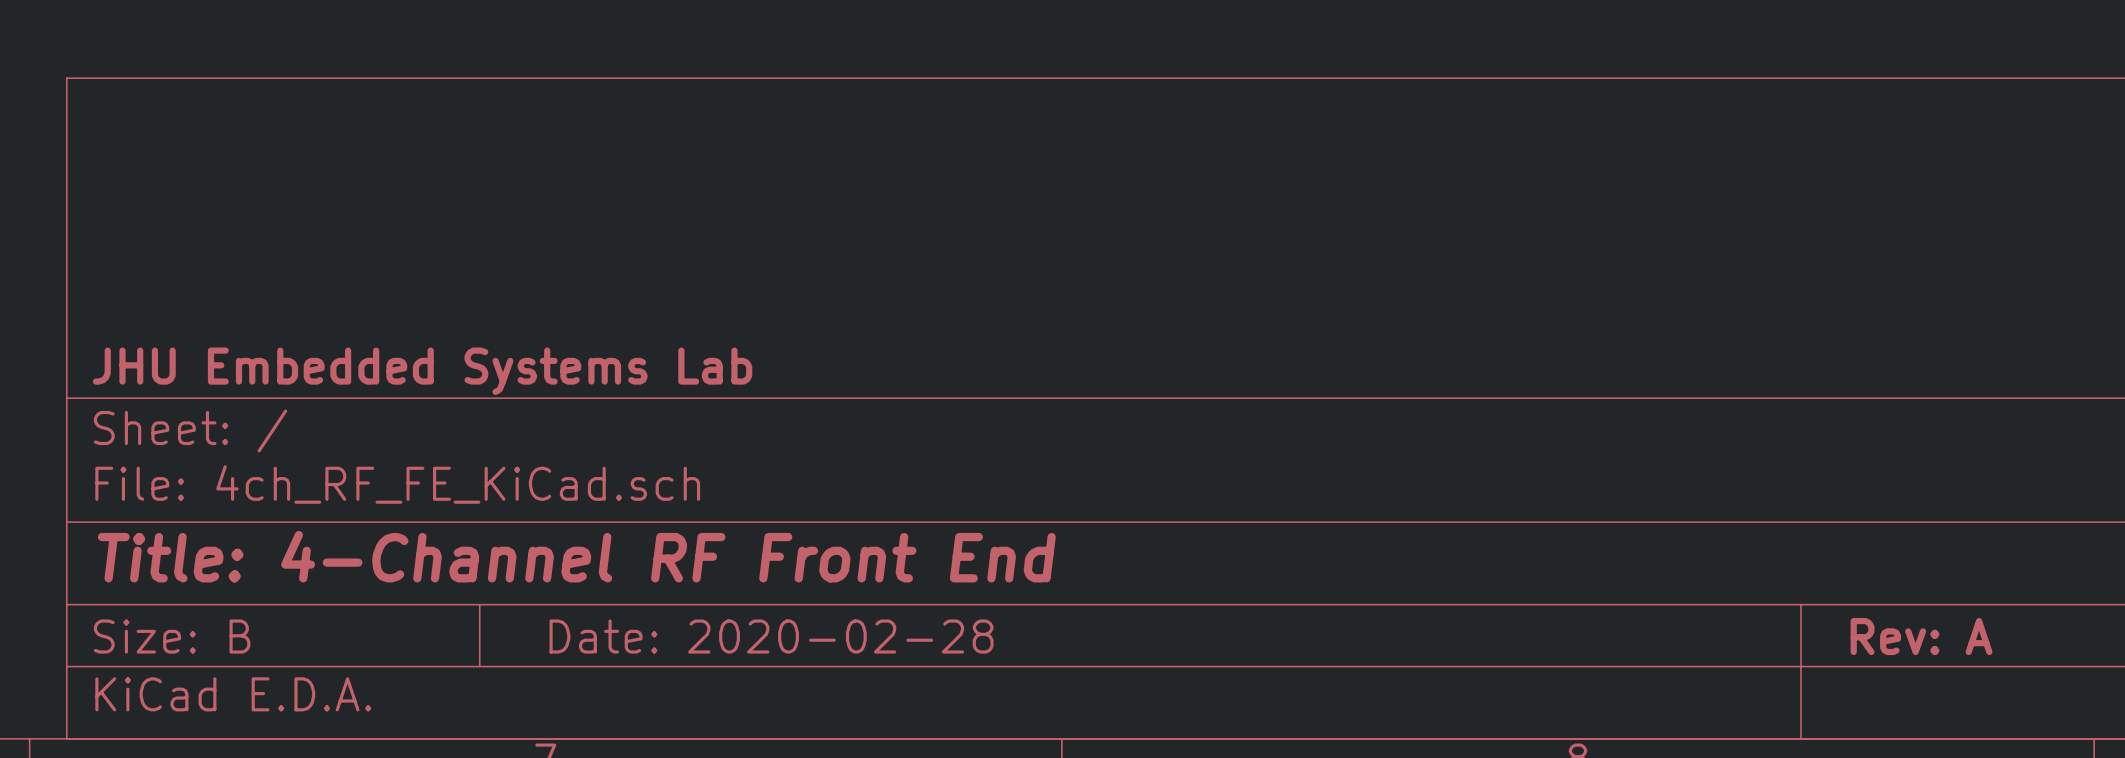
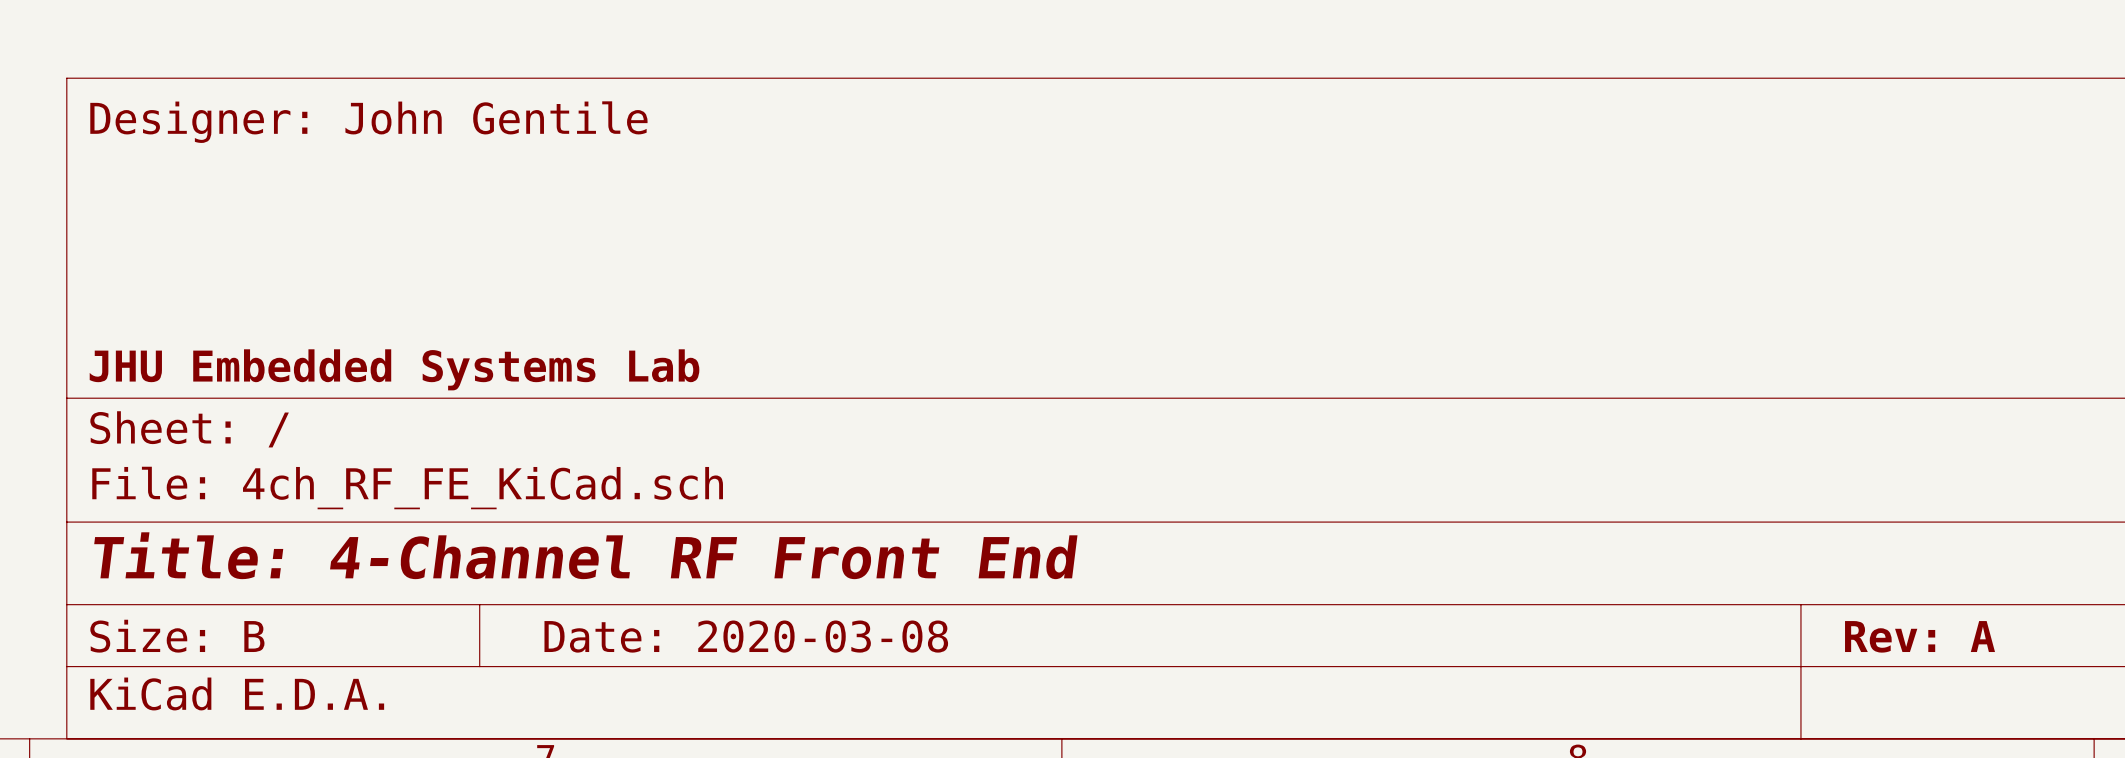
title block: none -> Designer: John Gentile (368, 122)
title block: Date: 2020-02-28 (771, 636) -> Date: 2020-03-08 (746, 636)

